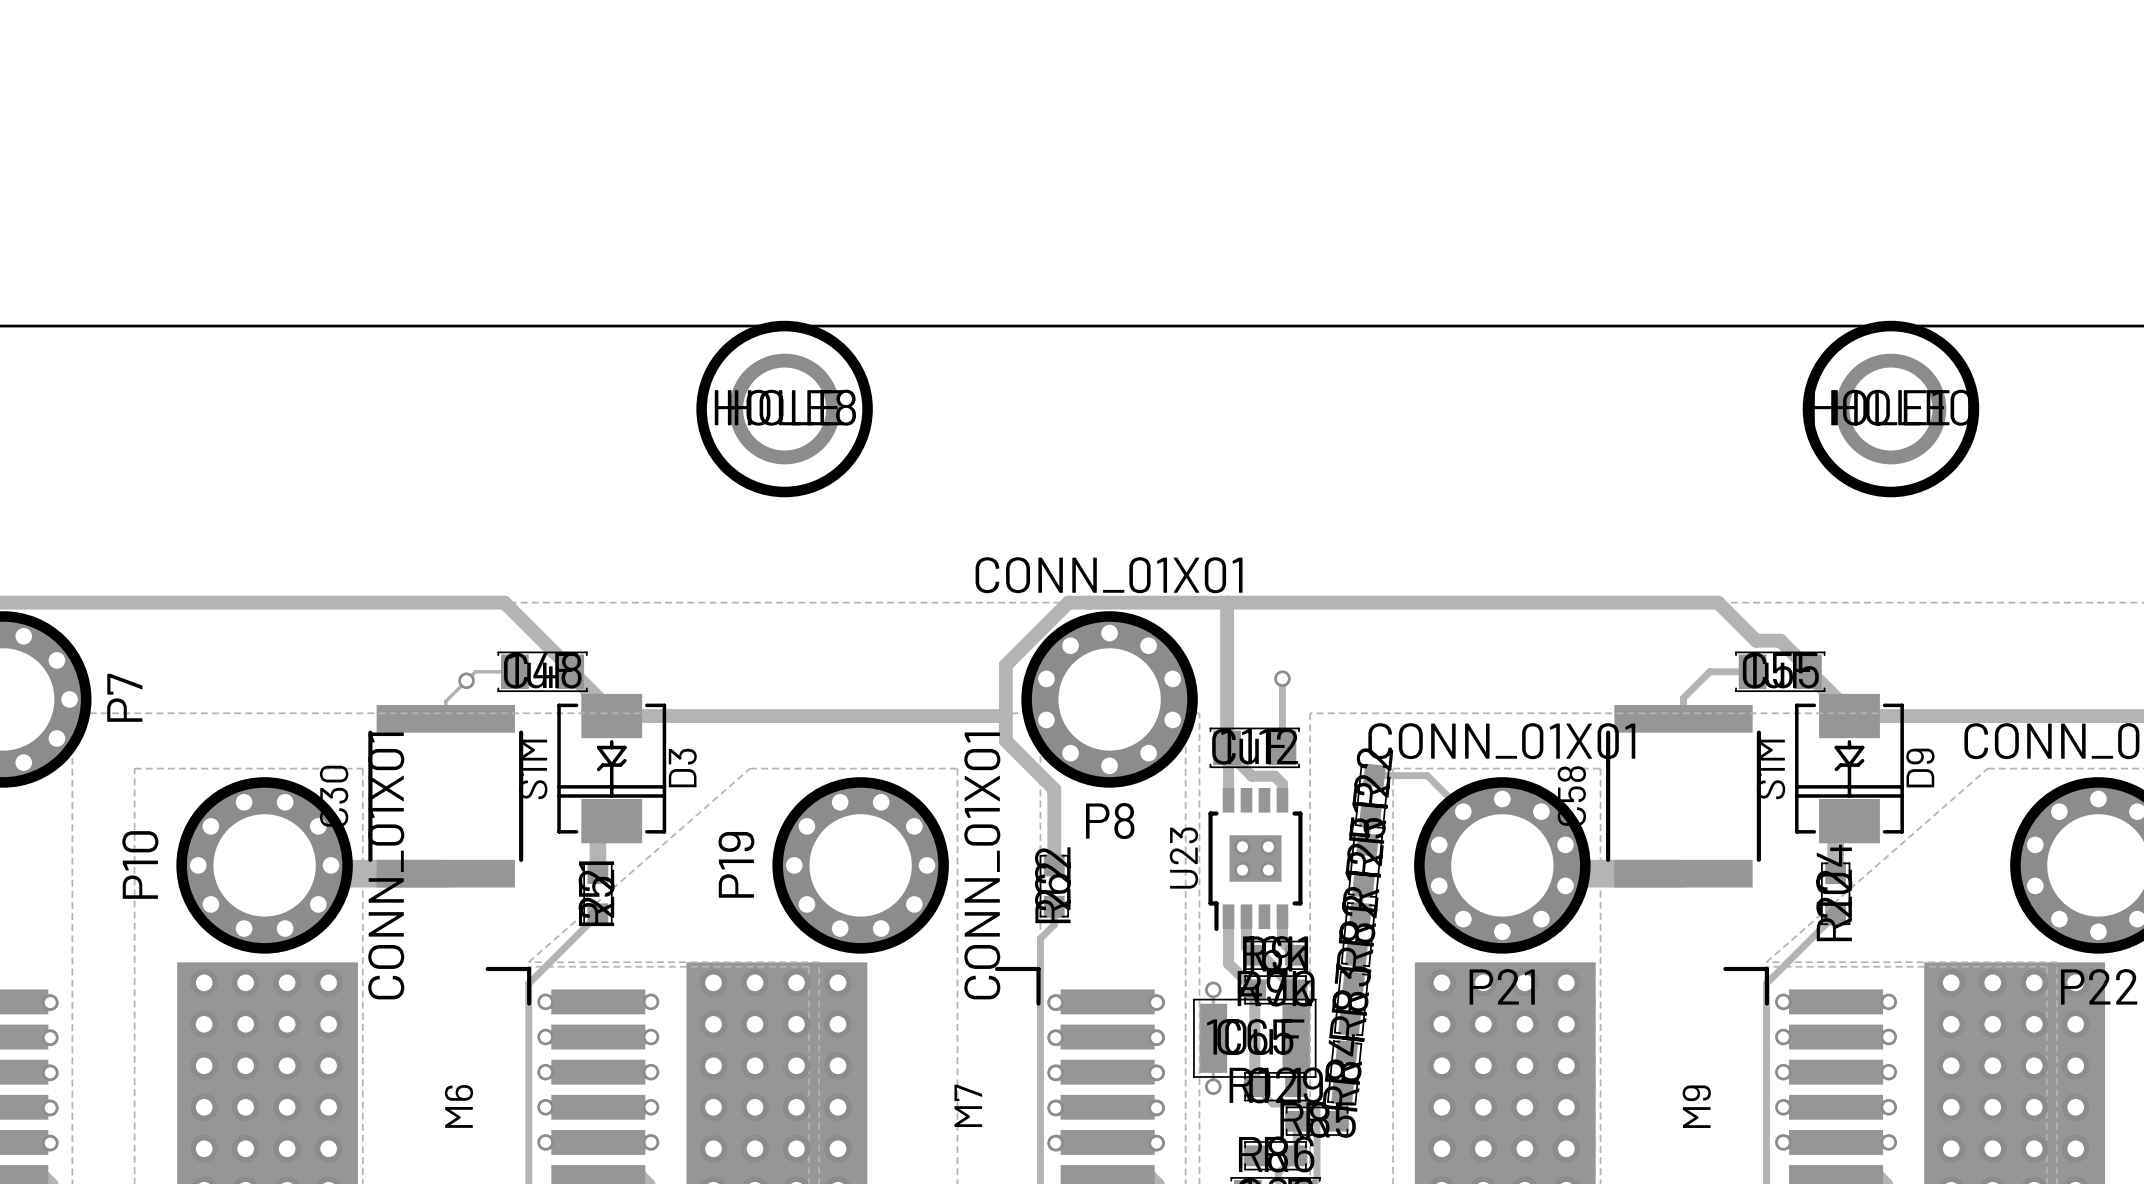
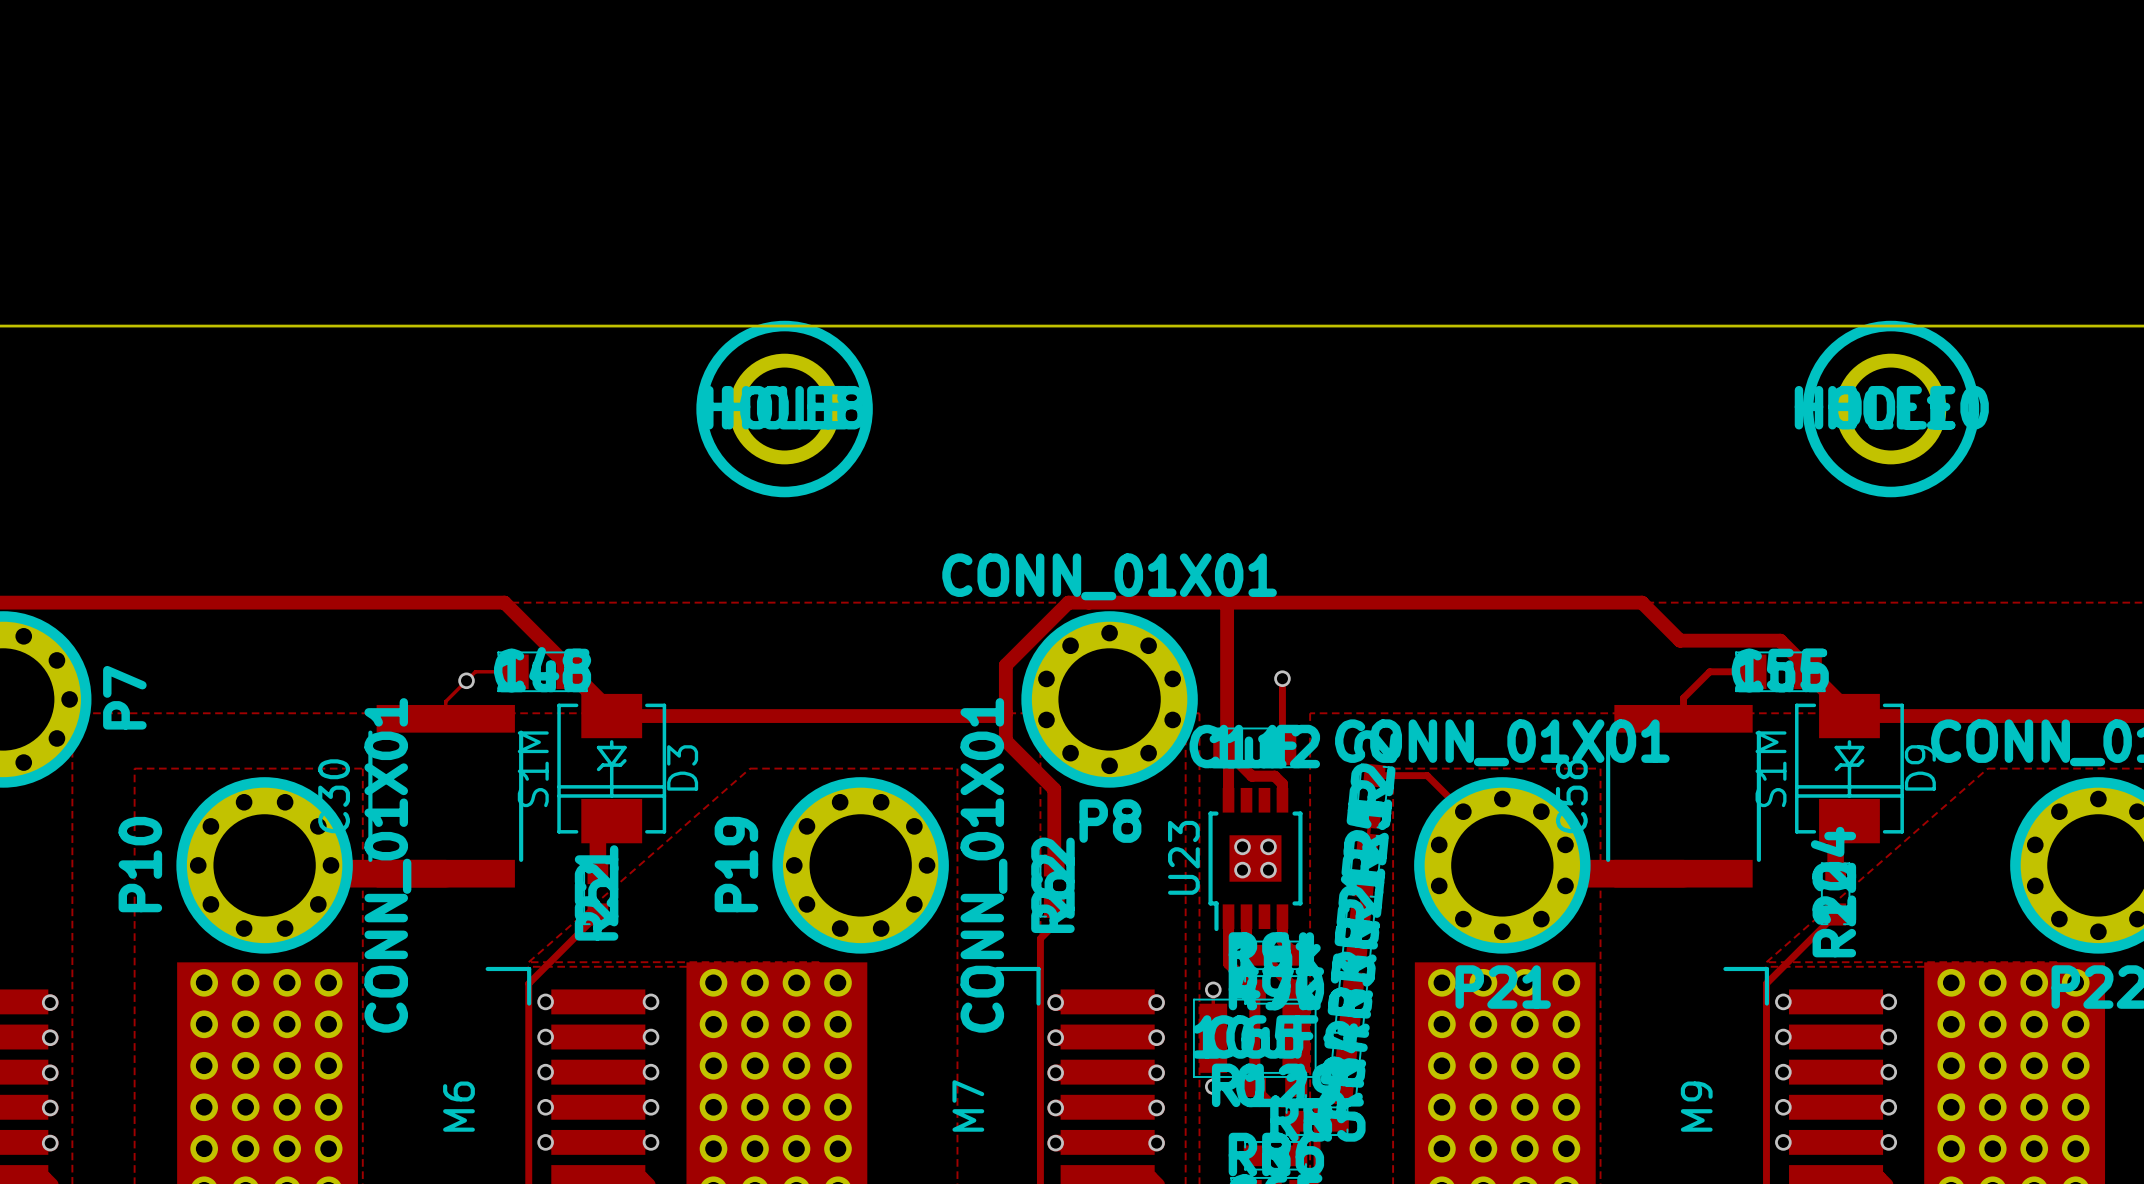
track: (1642, 602) (1718, 602) (1756, 640) -> (1642, 602) (1680, 640) (1756, 640)

